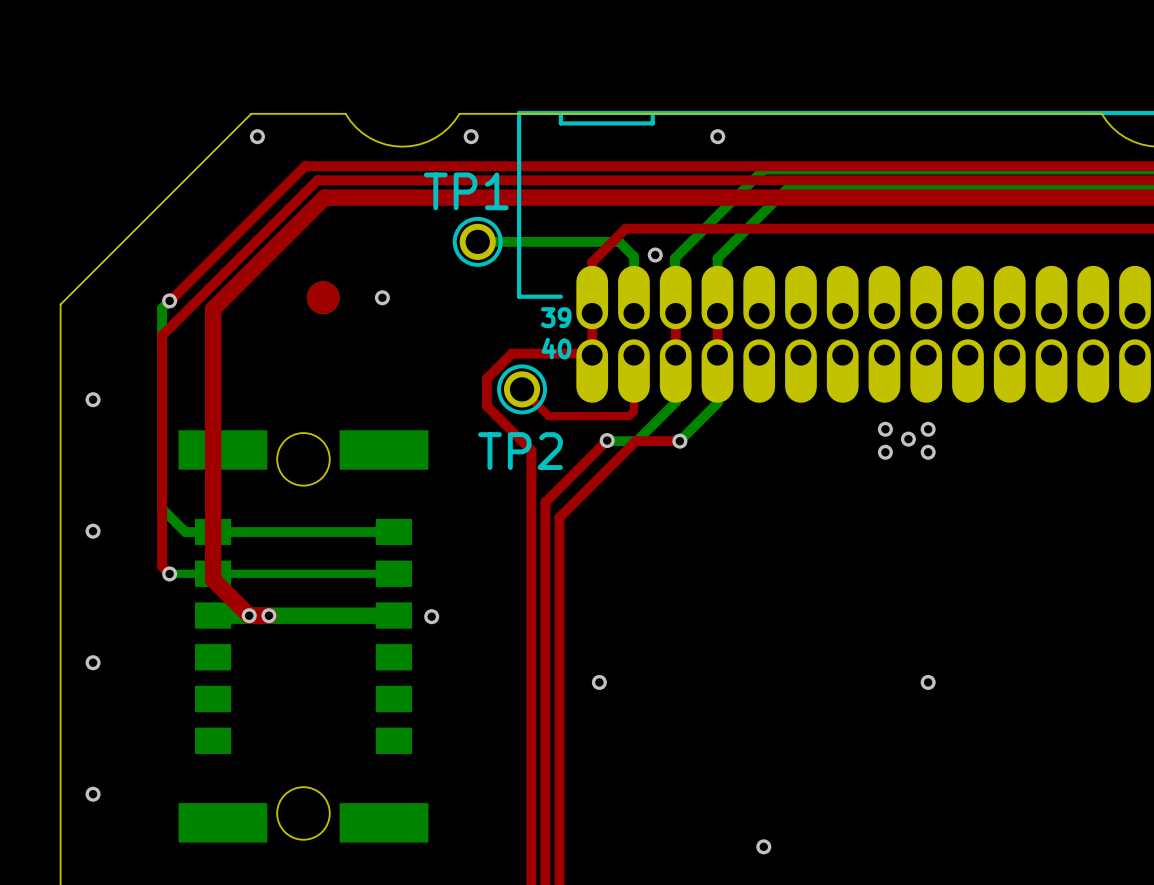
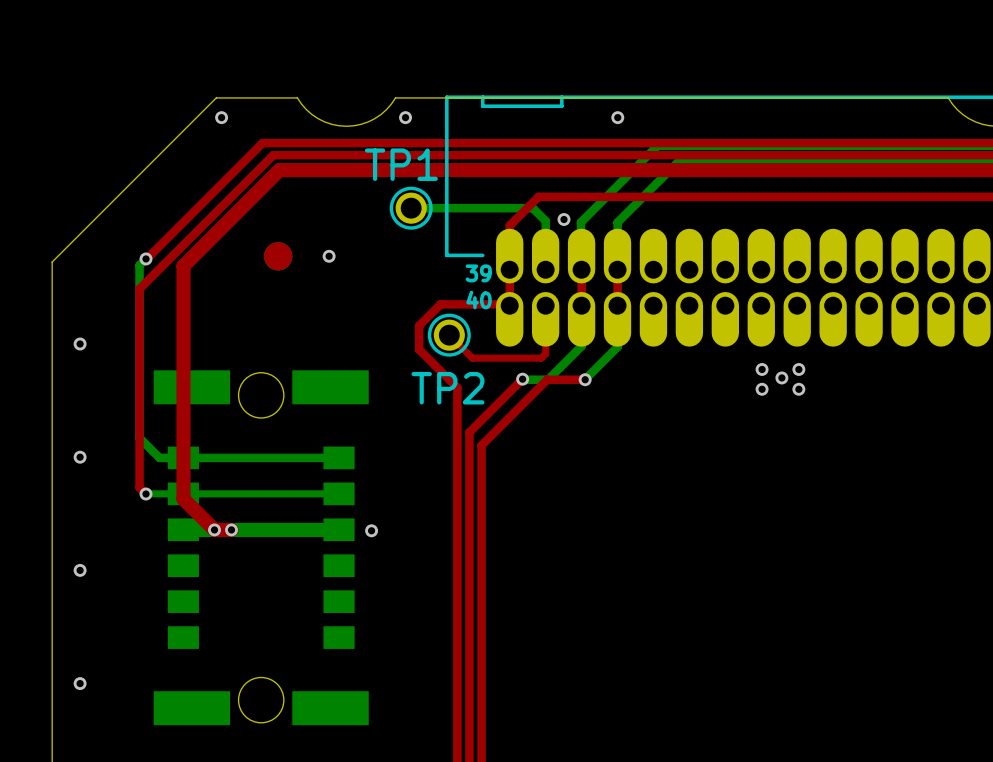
via: (599, 682) -> none
via: (928, 682) -> none
via: (763, 846) -> none

